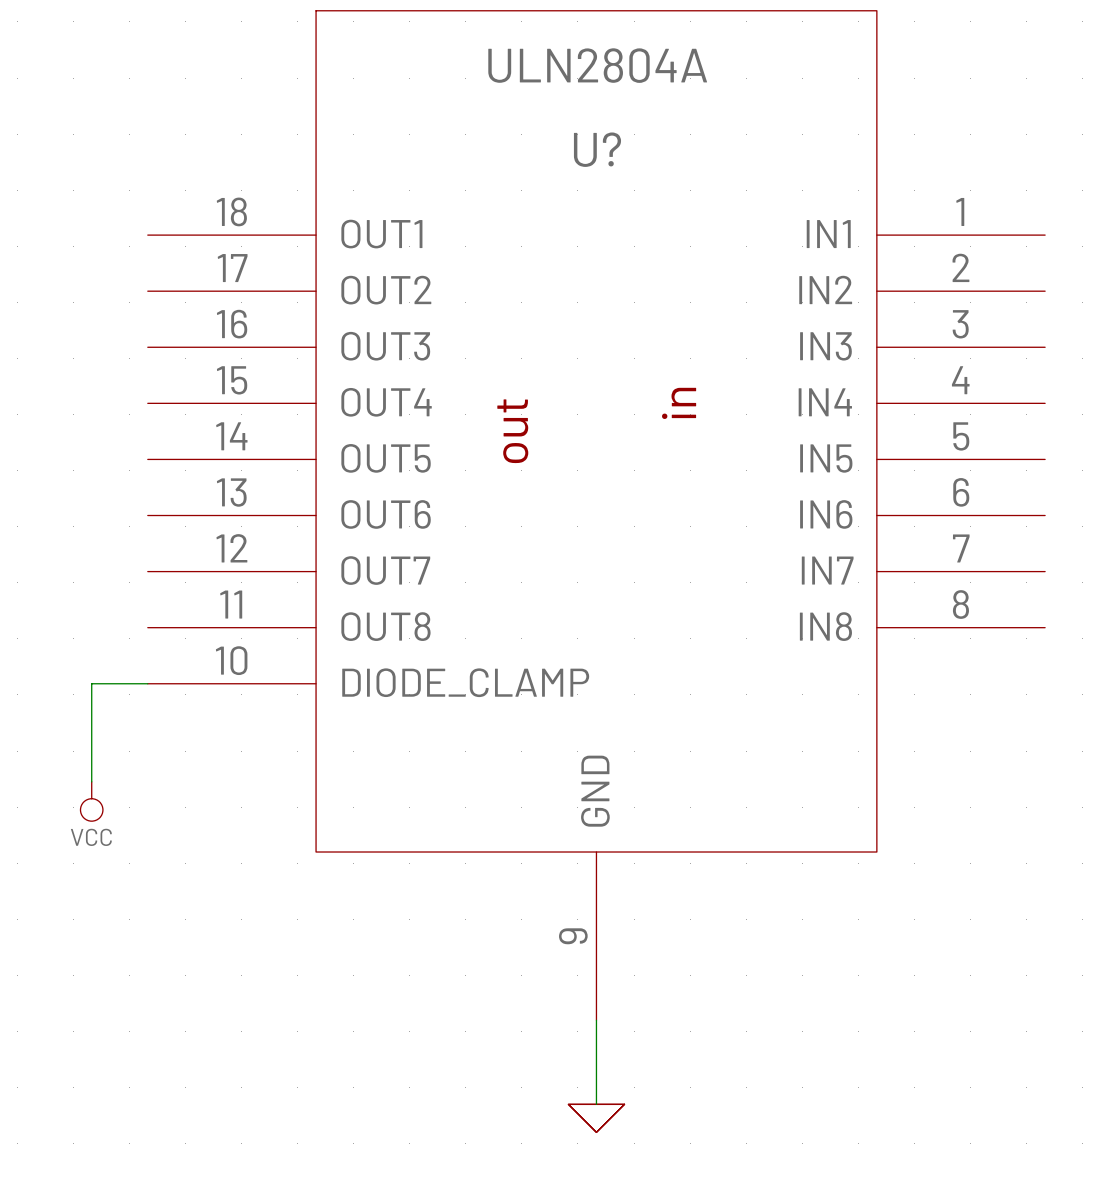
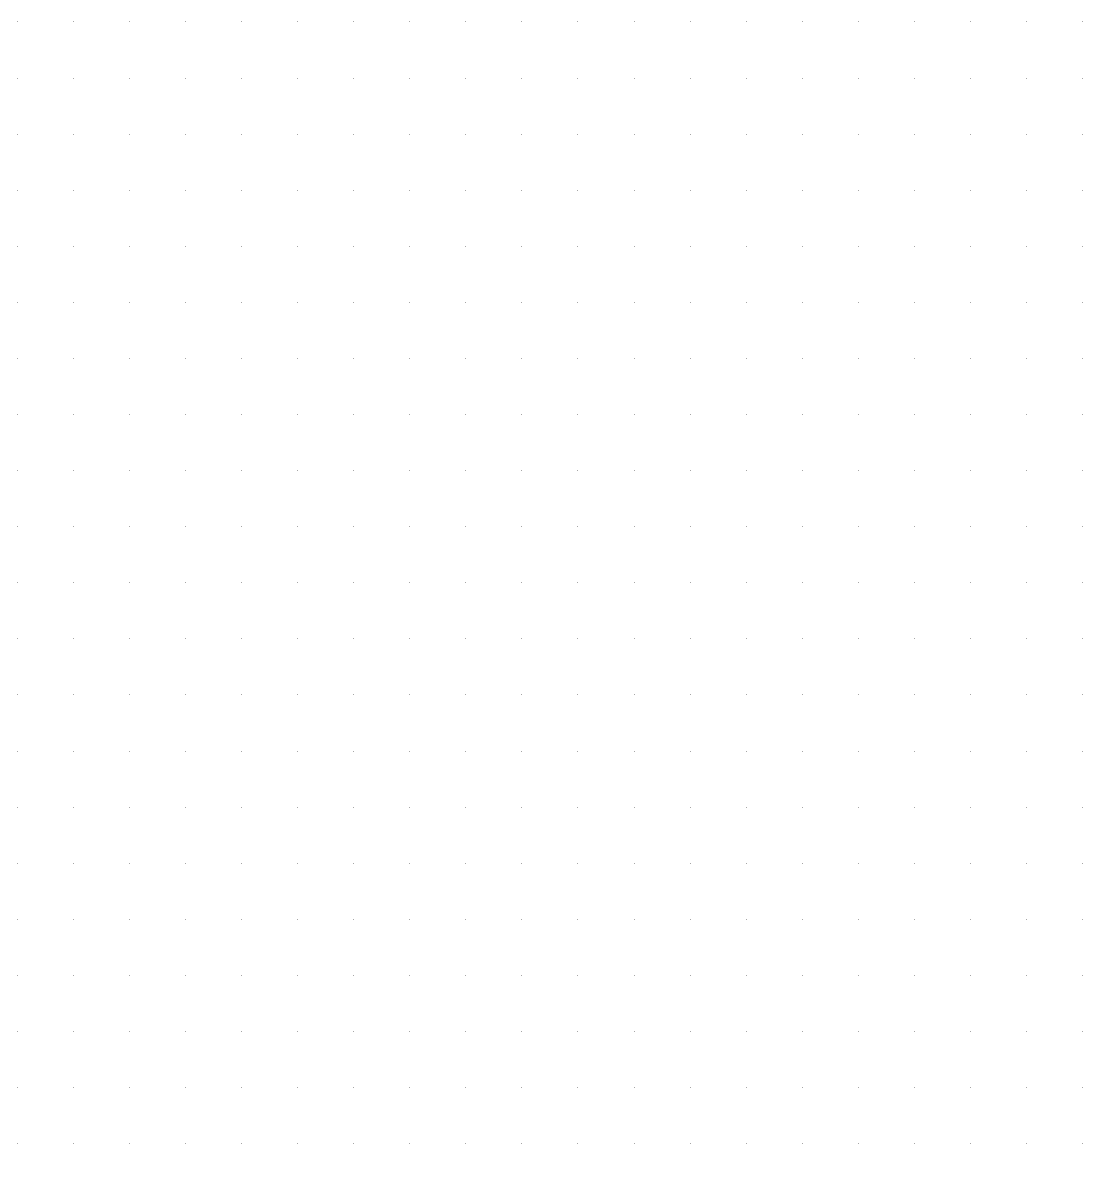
U?: ULN2804A (596, 515) -> none
wire: (147, 683) (91, 683) (91, 781) -> none
power symbol: VCC (91, 801) -> none
wire: (596, 1020) (596, 1104) -> none
power symbol: (596, 1118) -> none

